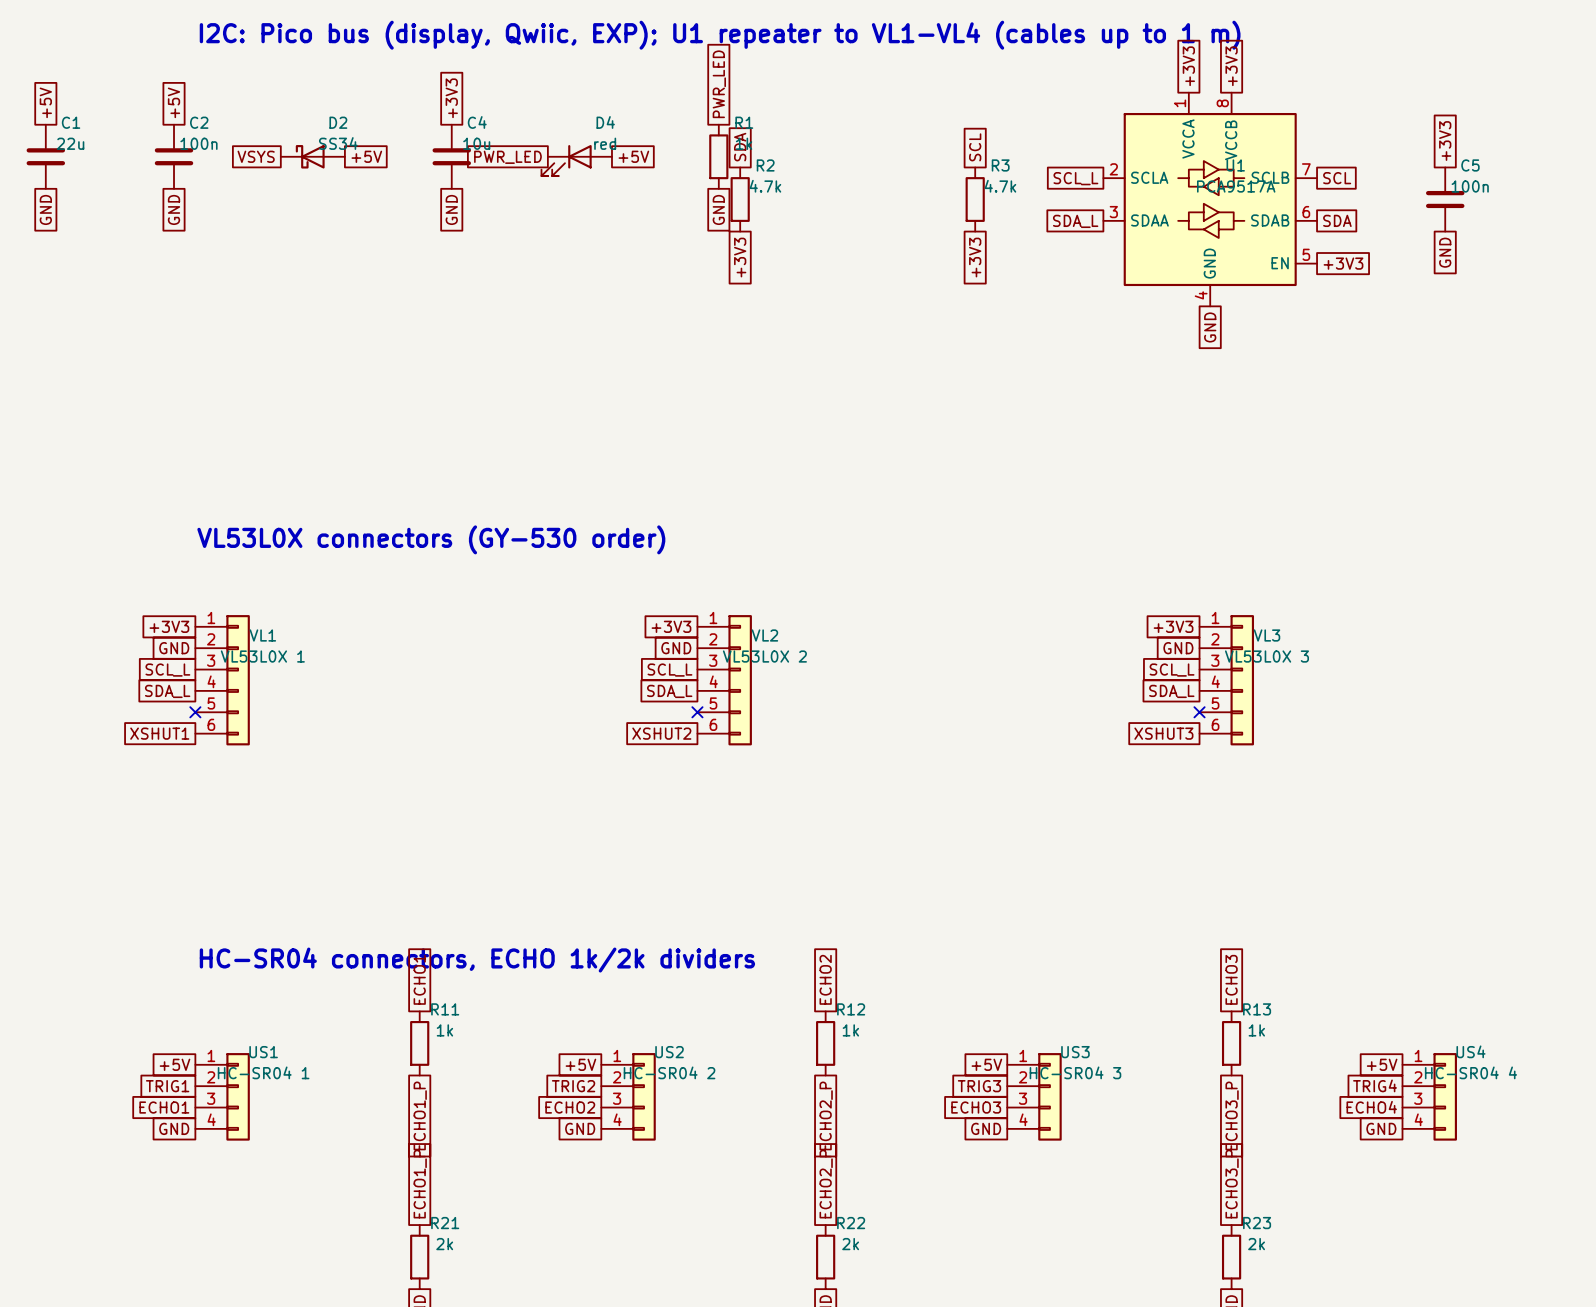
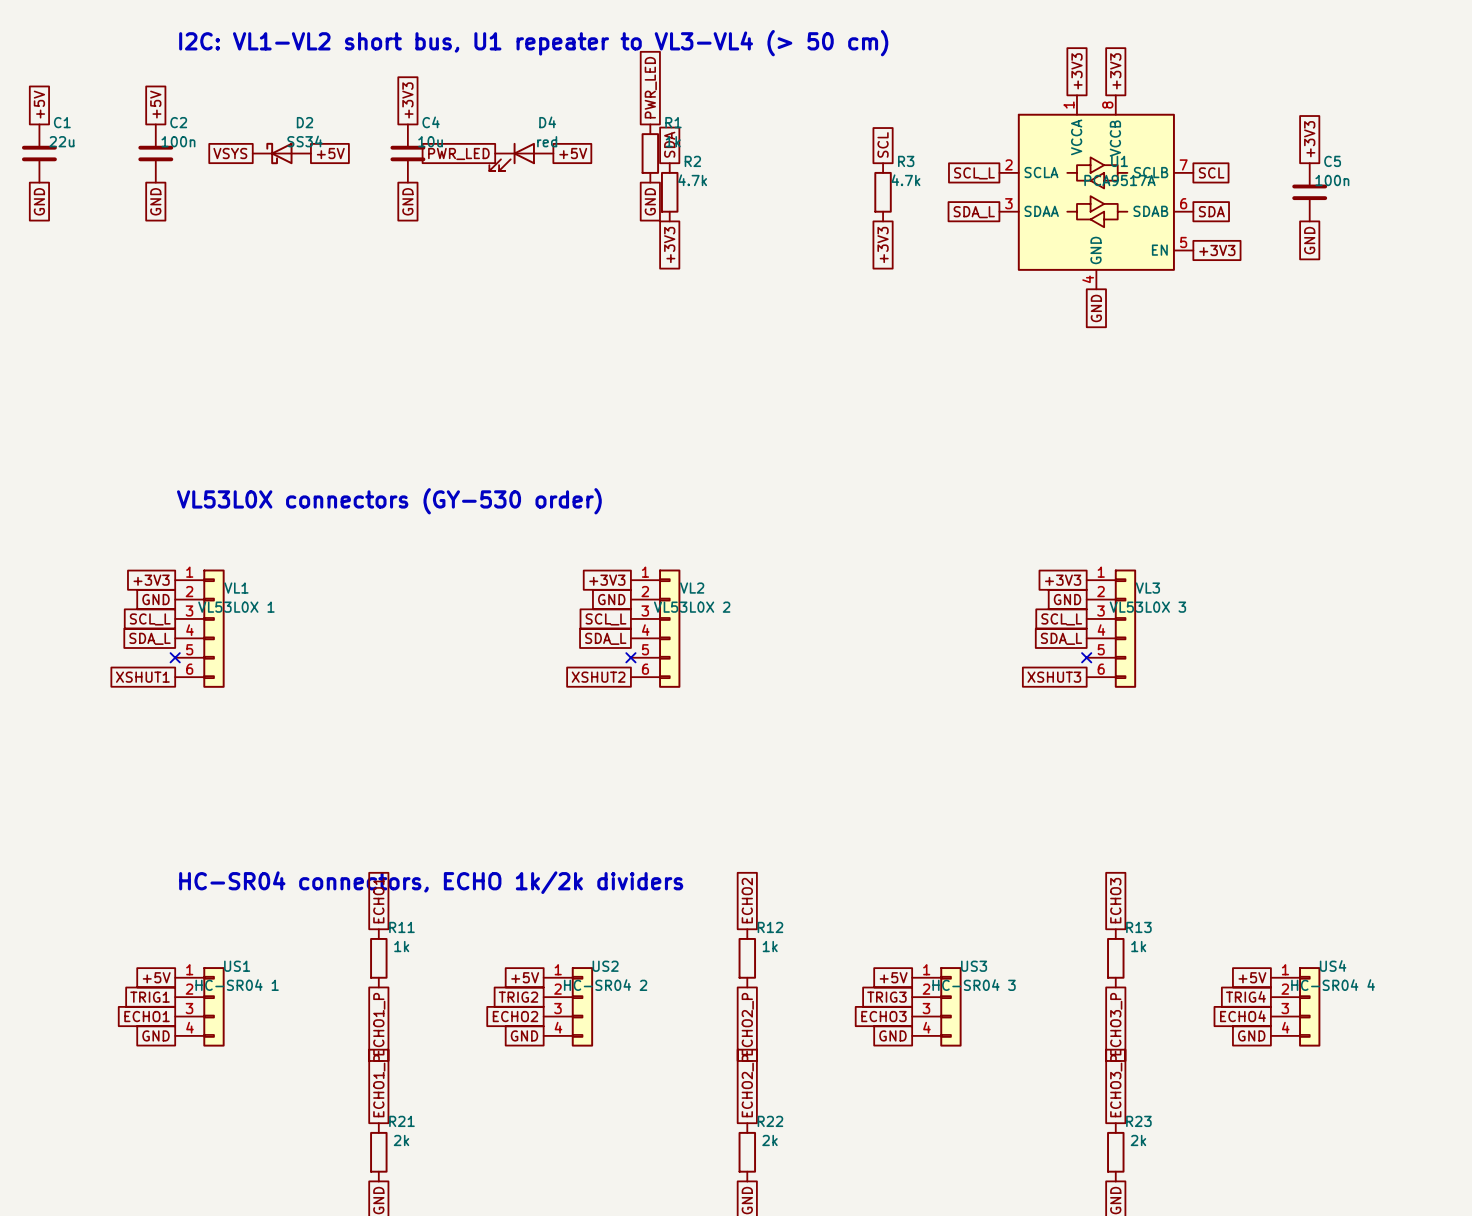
text: I2C: Pico bus (display, Qwiic, EXP); U1 repeater to VL1-VL4 (cables up to 1 m) (720, 35) -> I2C: VL1-VL2 short bus, U1 repeater to VL3-VL4 (> 50 cm) (533, 43)

